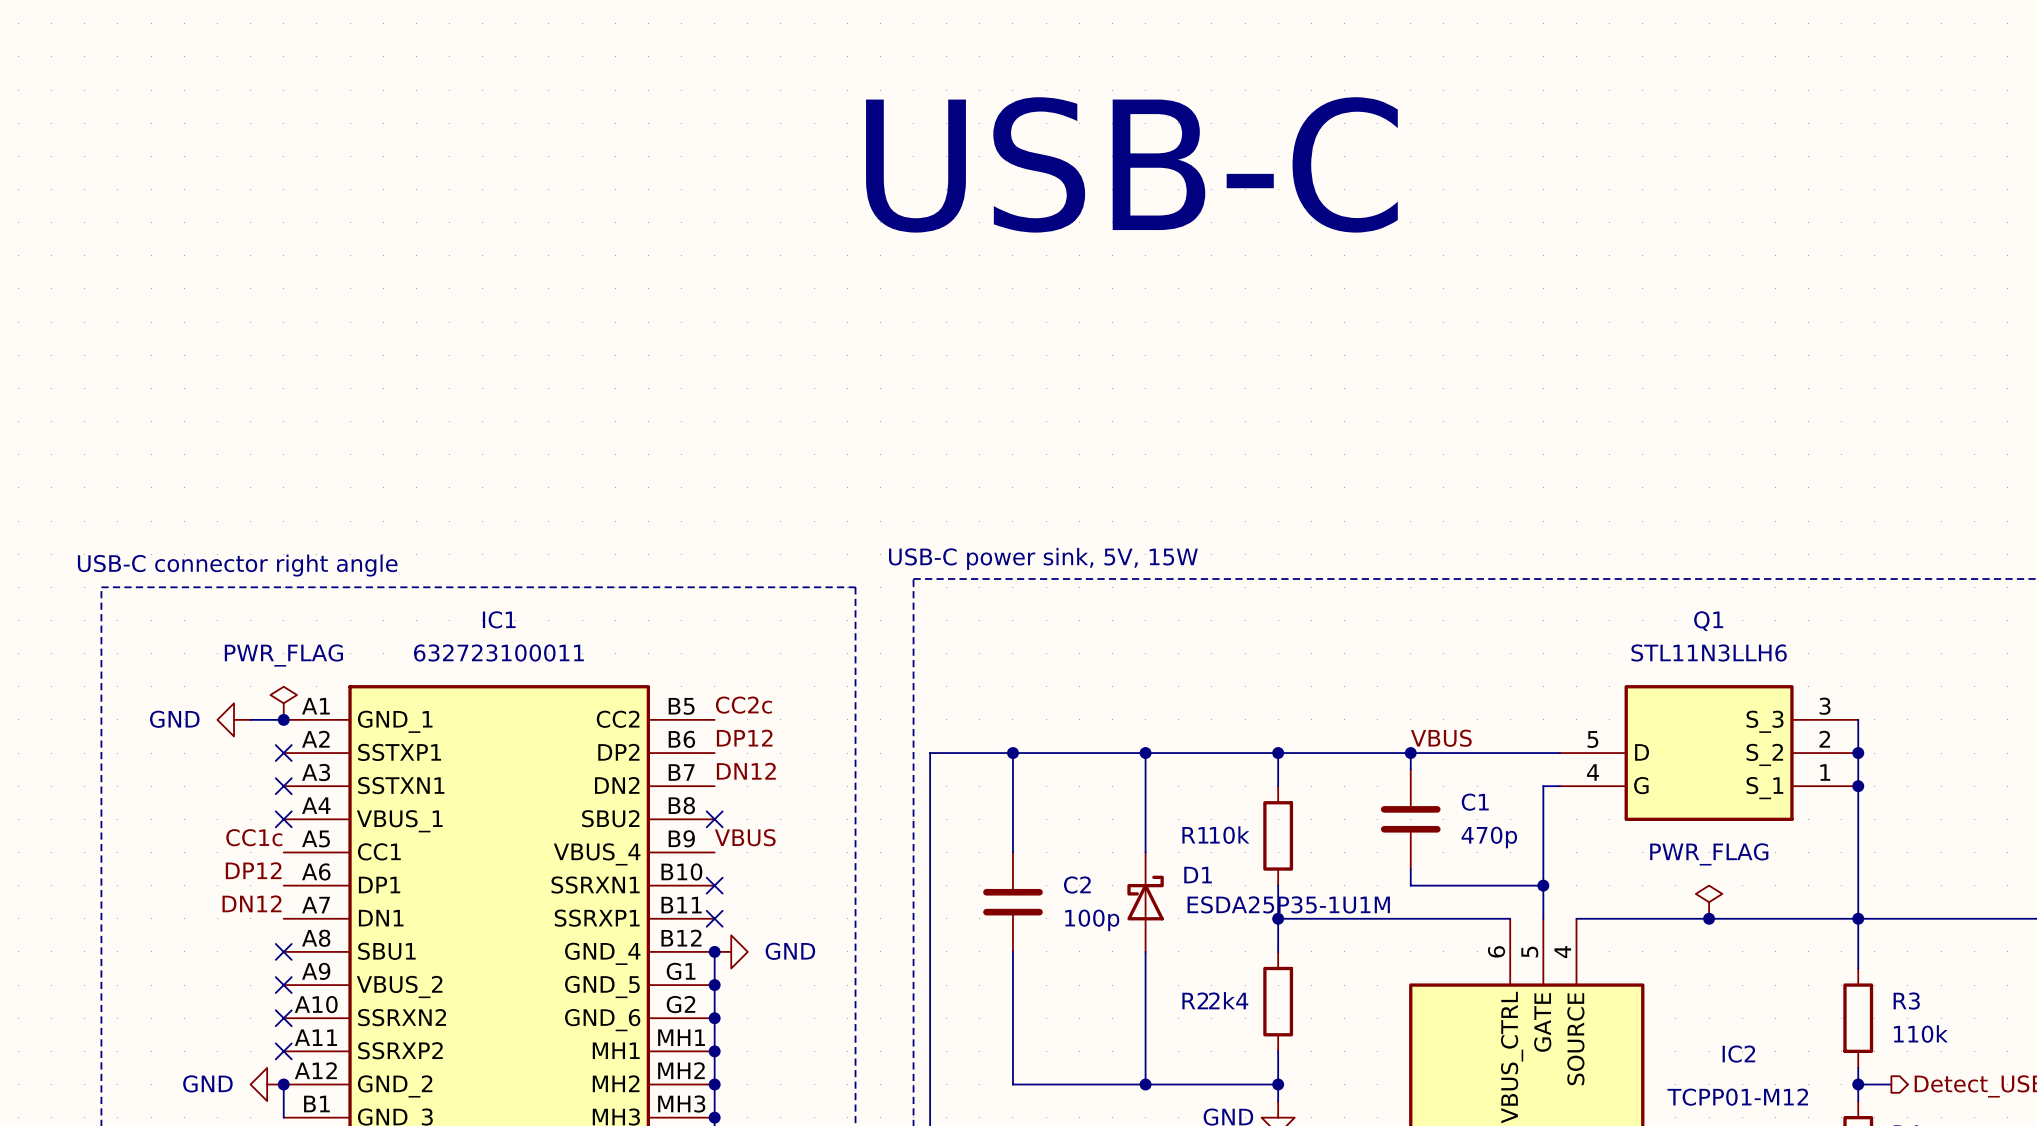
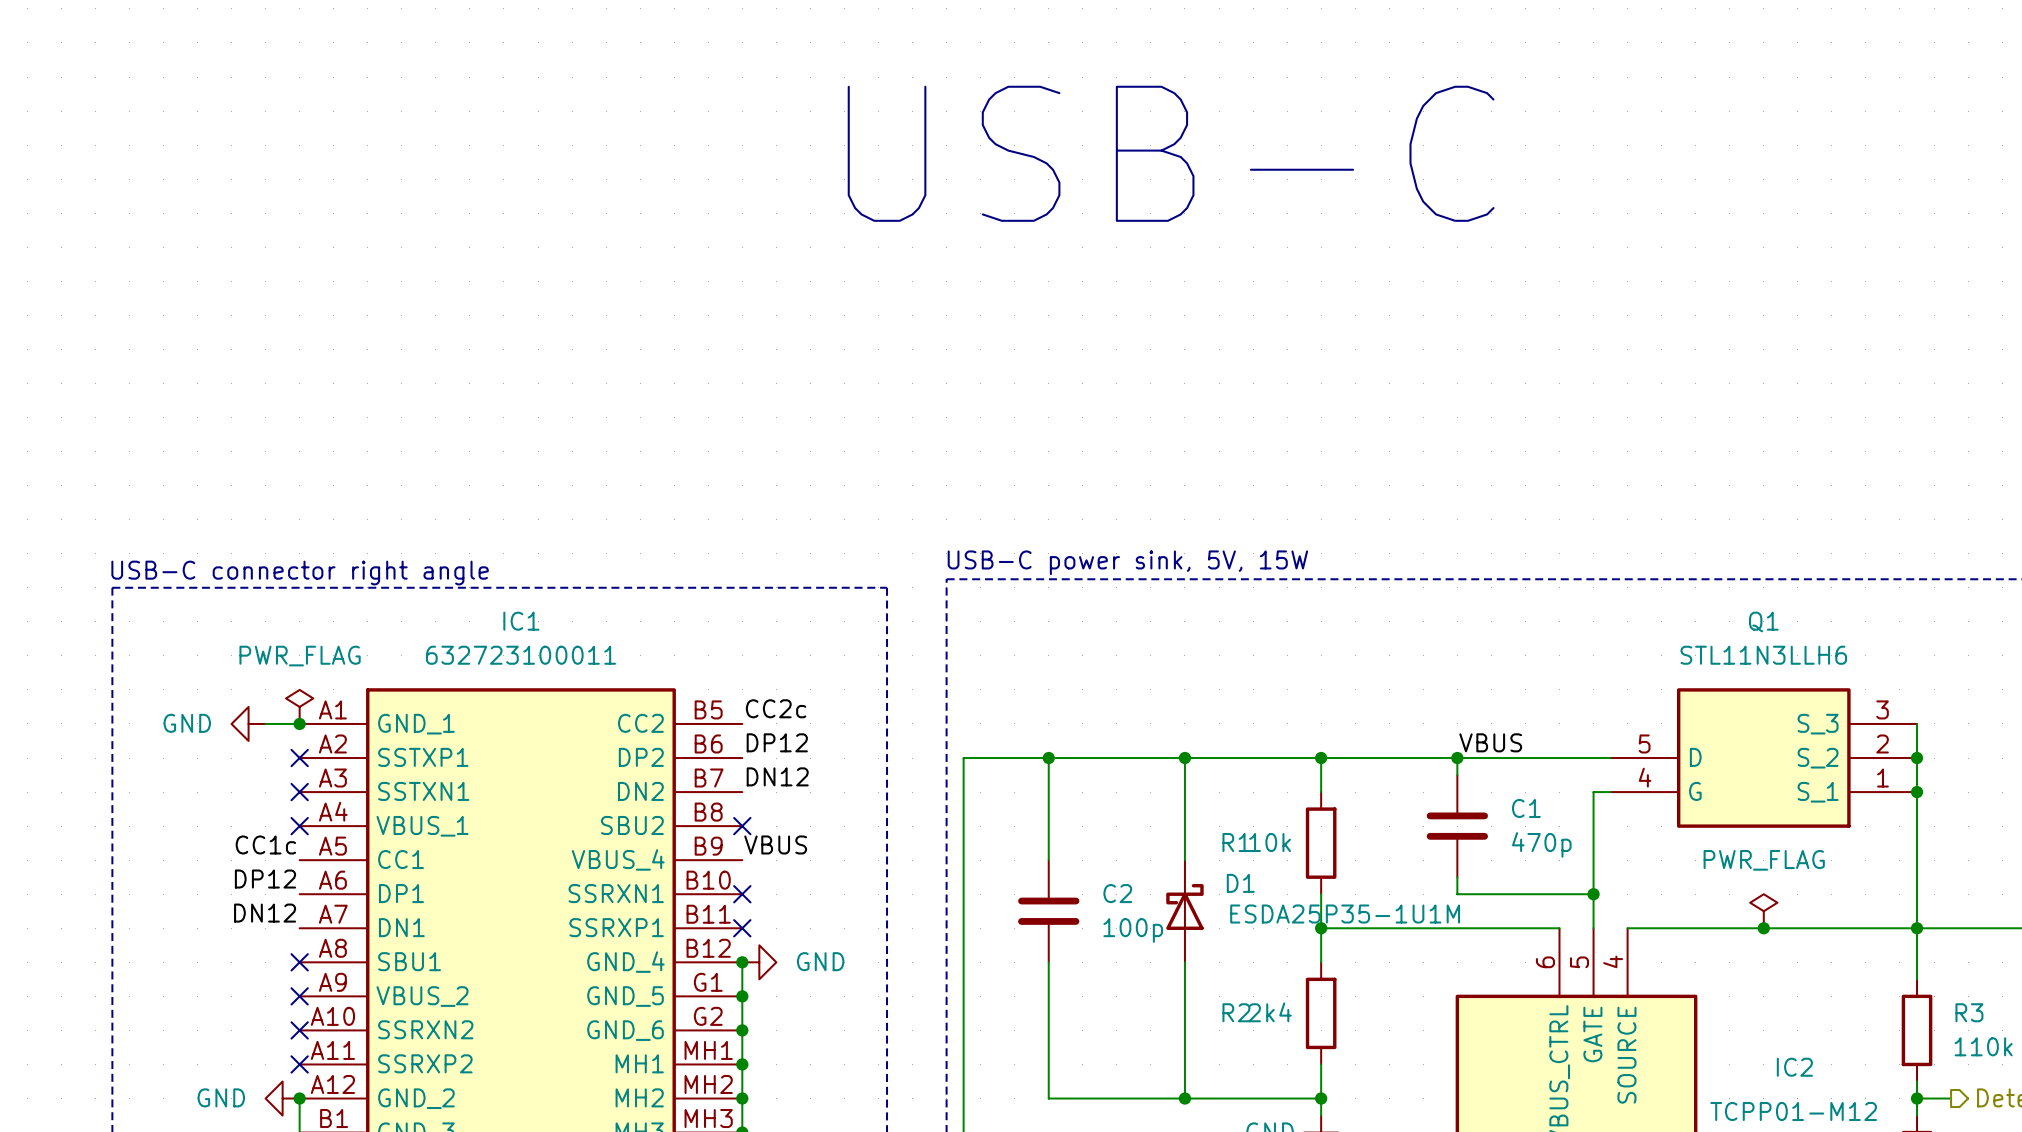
text position: USB-C power sink, 5V, 15W (1043, 558) -> USB-C power sink, 5V, 15W (1127, 562)
text position: USB-C connector right angle (237, 565) -> USB-C connector right angle (300, 573)

